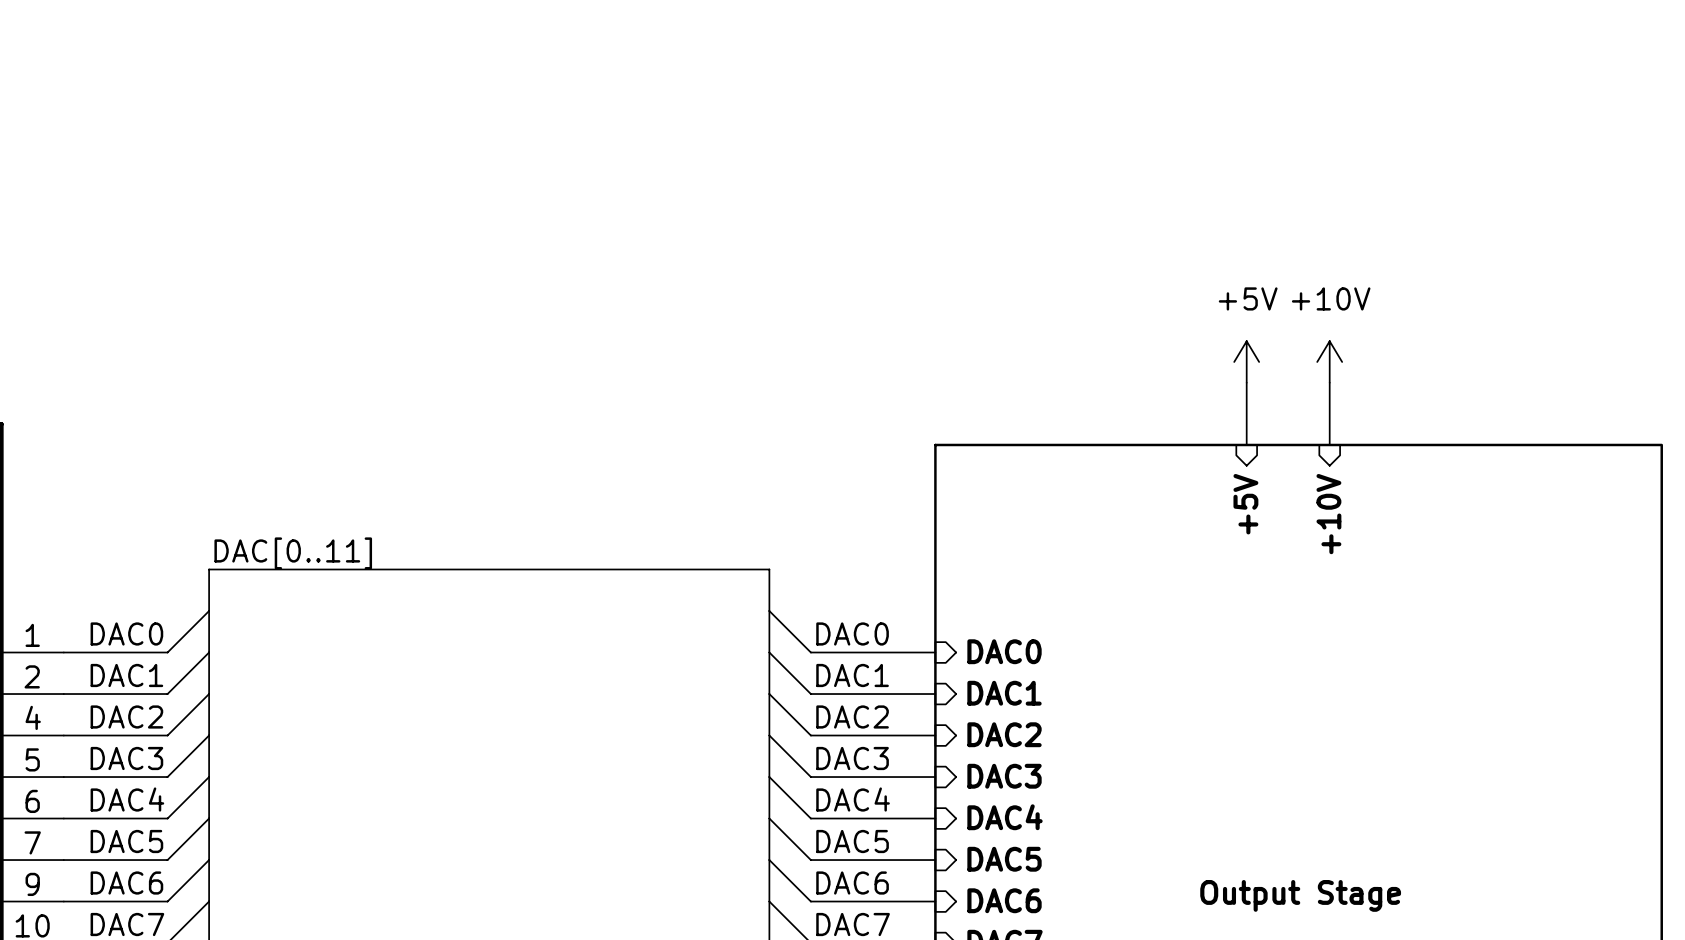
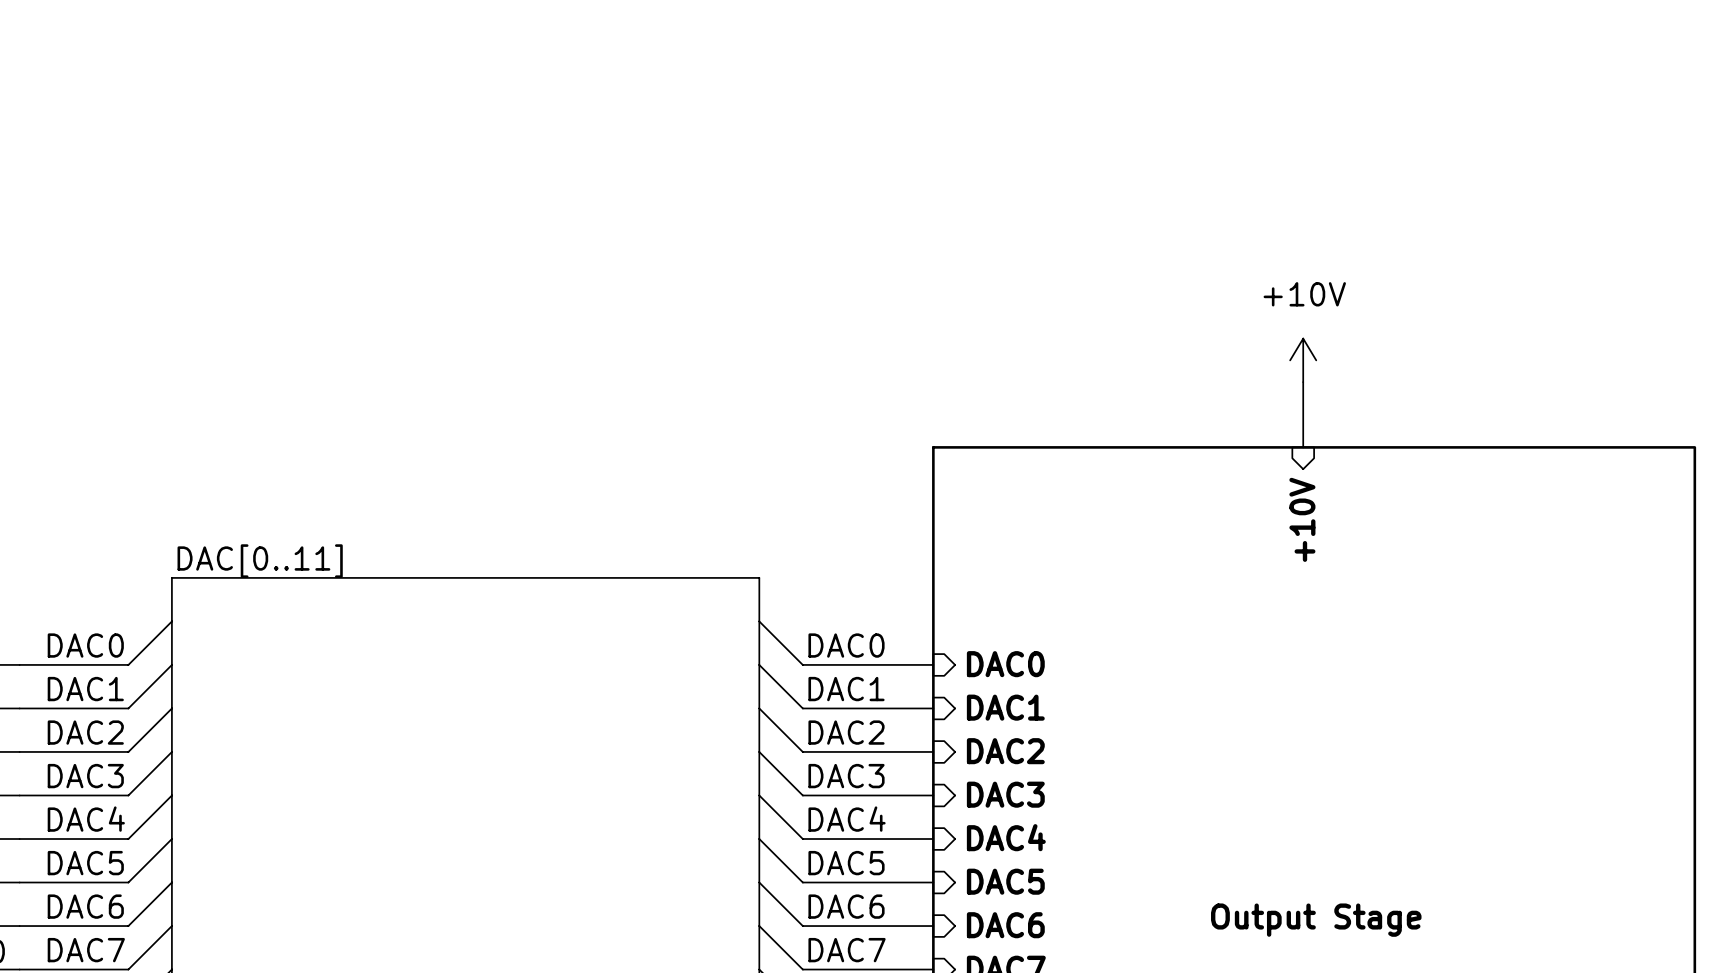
power symbol: +5V (1246, 361) -> none
power symbol position: +10V (1329, 361) -> +10V (1303, 360)
wire: (1246, 382) (1246, 444) -> (1303, 382) (1303, 447)
wire: (1329, 382) (1329, 444) -> none
sheet pin: +5V (1245, 504) -> none
sheet pin position: +10V (1328, 514) -> +10V (1302, 519)

